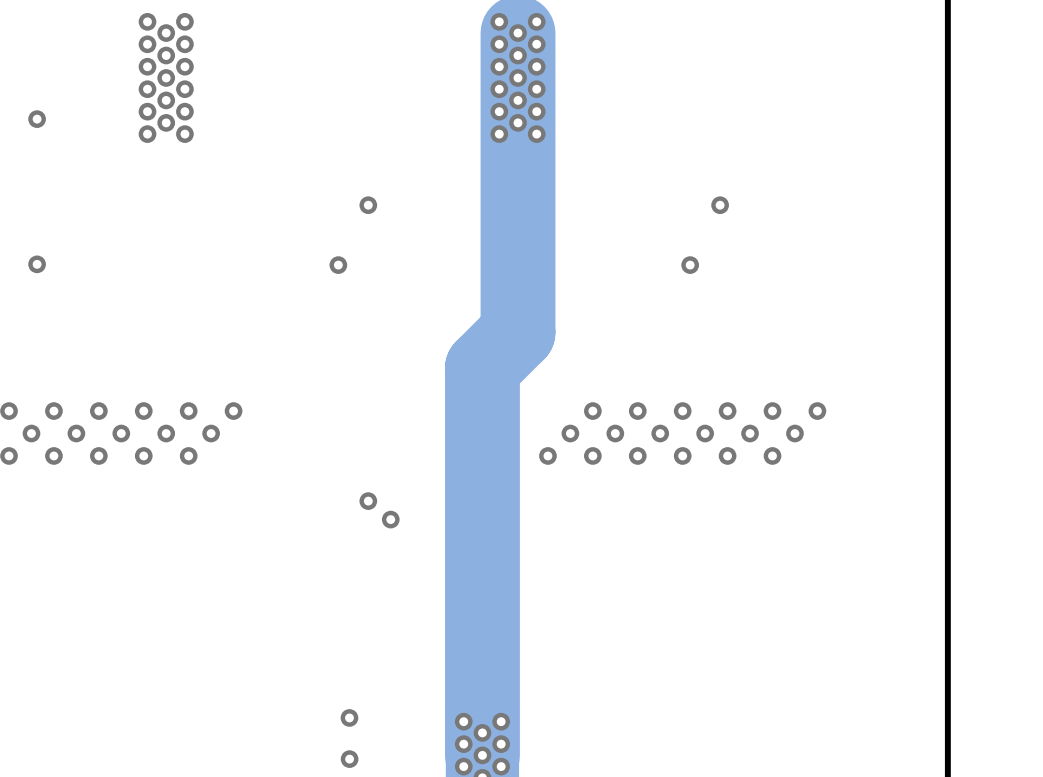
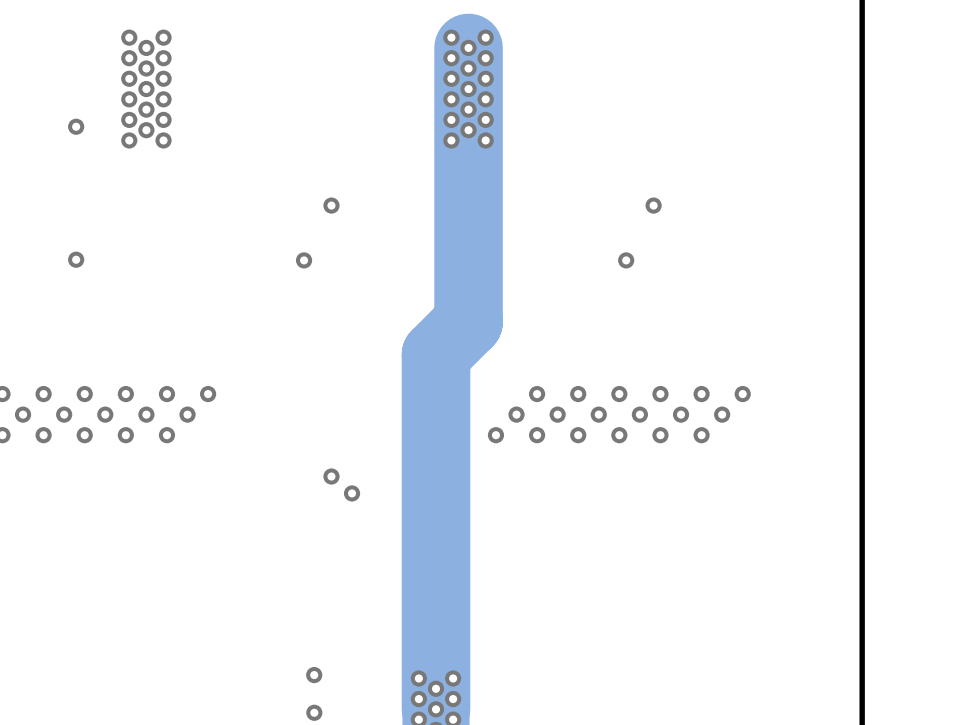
via position: (37, 119) -> (76, 126)
via position: (37, 264) -> (76, 259)

